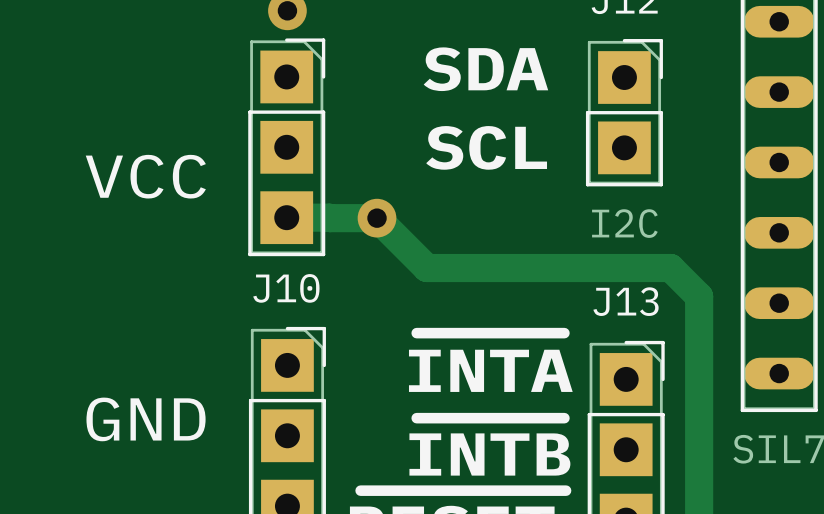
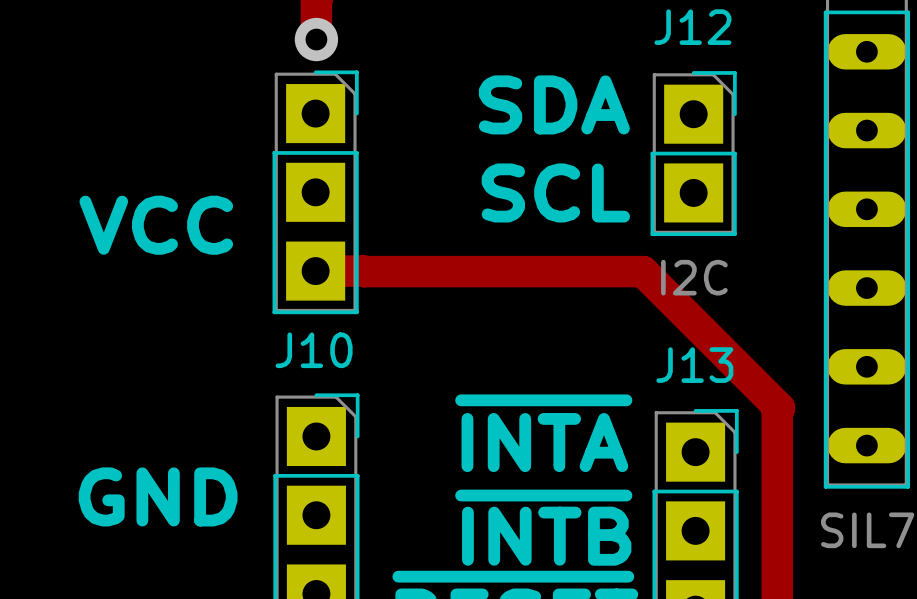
via: (377, 218) -> none
track: (374, 220) (377, 218) (426, 268) (670, 268) (699, 296) (699, 342) -> (416, 271) (643, 271) (779, 408) (777, 410)

